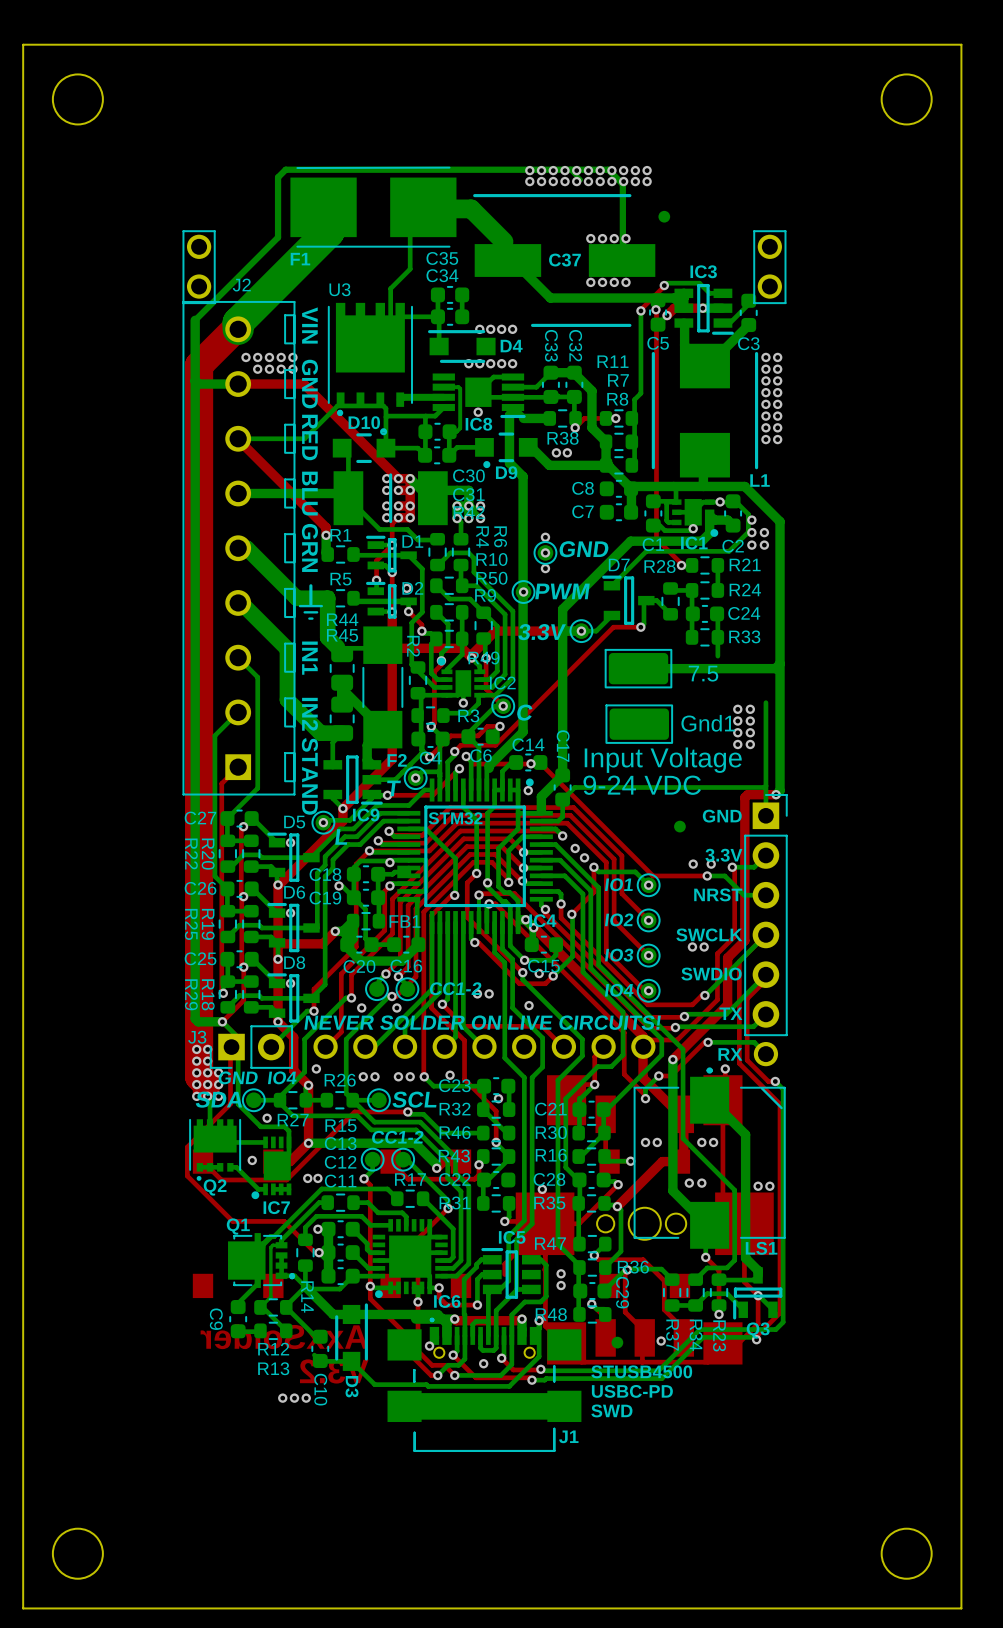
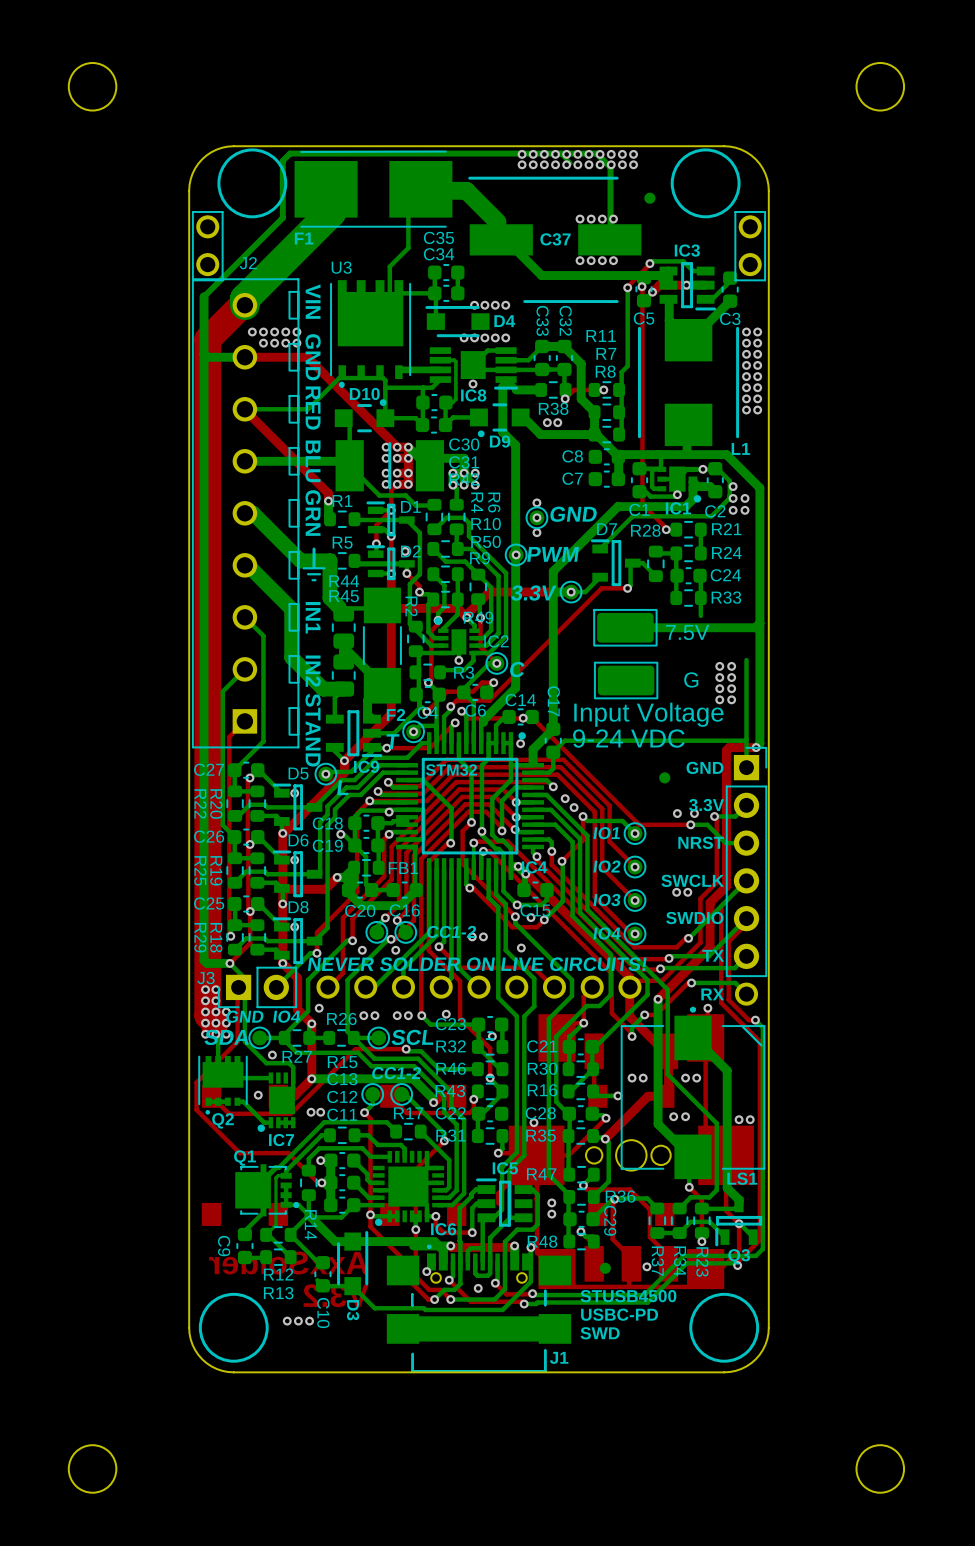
board edge: (961, 44) (961, 1608) (23, 1608) (23, 44) (961, 44) -> (724, 146) (741, 149) (755, 159) (765, 173) (768, 190) (768, 1327) (765, 1344) (755, 1359) (746, 1366) (735, 1370) (724, 1372) (233, 1372) (216, 1368) (206, 1363) (198, 1354) (192, 1344) (189, 1327) (189, 190) (192, 173) (198, 163) (206, 155) (222, 147) (233, 146) (724, 146)
drawing: none -> [217, 148, 288, 219]
drawing: none -> [670, 148, 741, 219]
7.5 name: 7.5 (703, 673) -> 7.5V (687, 632)
Gnd1 name: Gnd1 (708, 723) -> G (691, 679)
drawing: none -> [198, 1292, 269, 1363]
drawing: none -> [689, 1292, 760, 1363]

